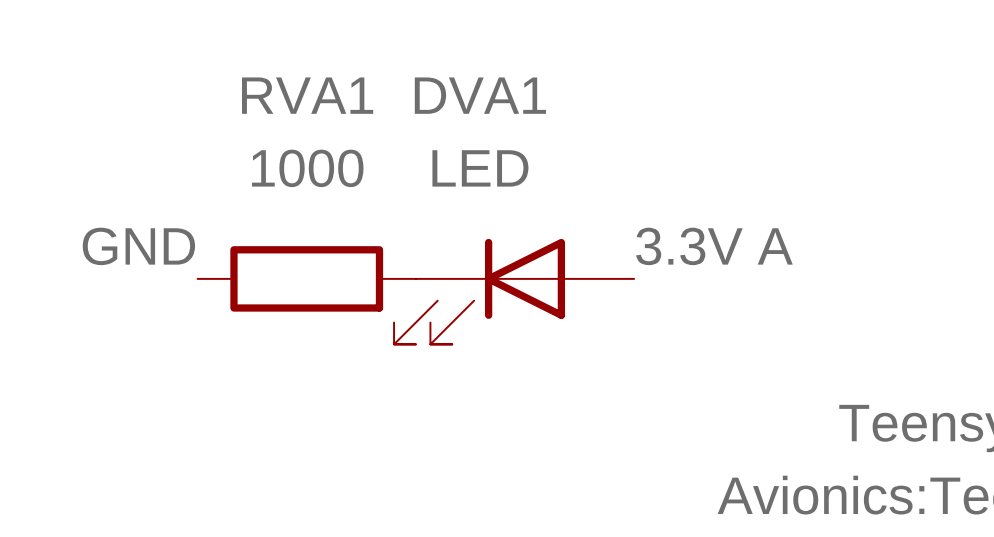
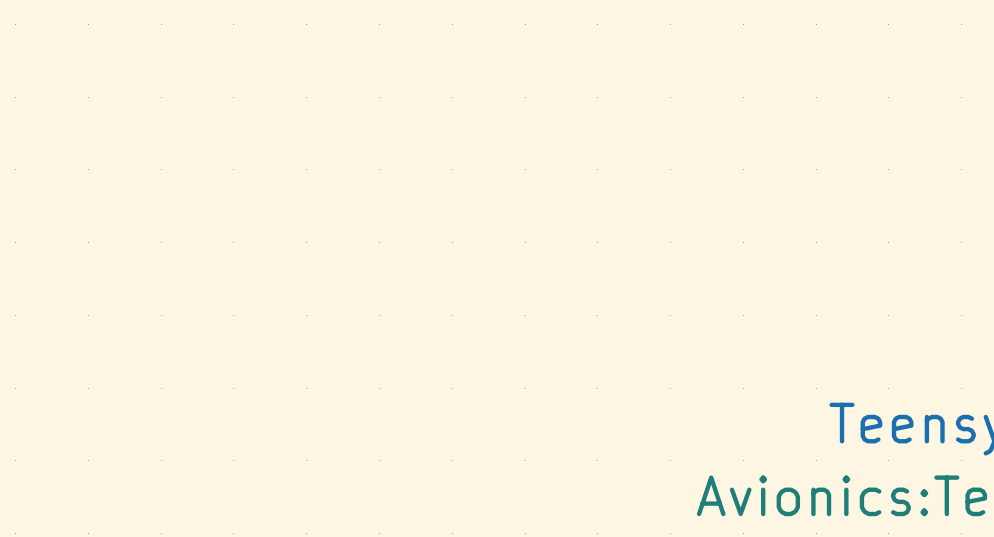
label: GND (138, 246) -> none
label: 3.3V A (714, 246) -> none
RVA1: 1000 (306, 278) -> none
DVA1: LED (514, 291) -> none

